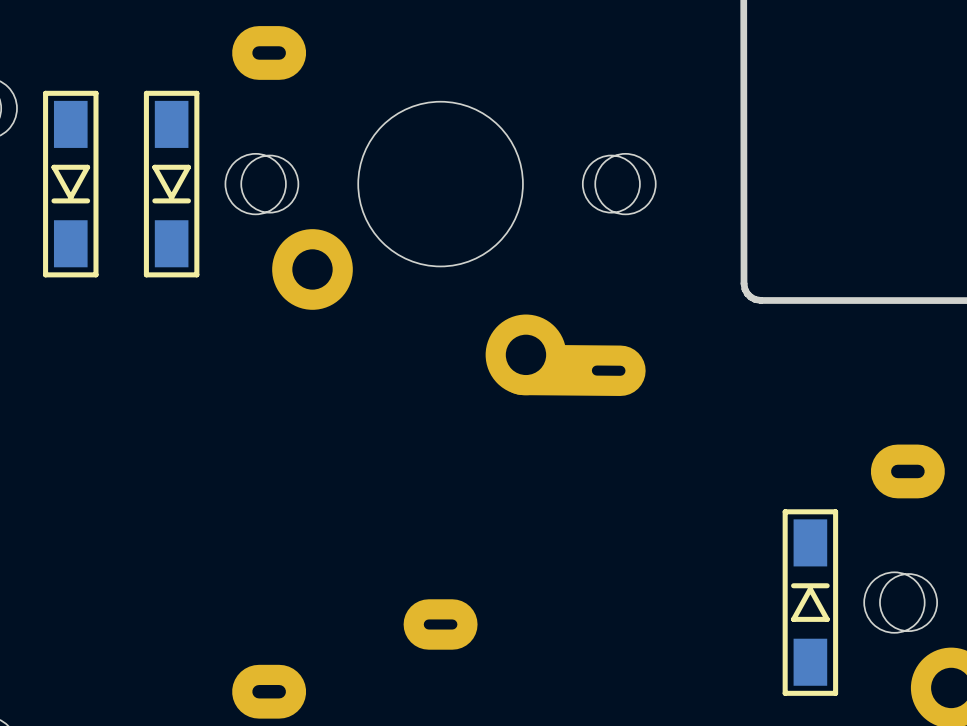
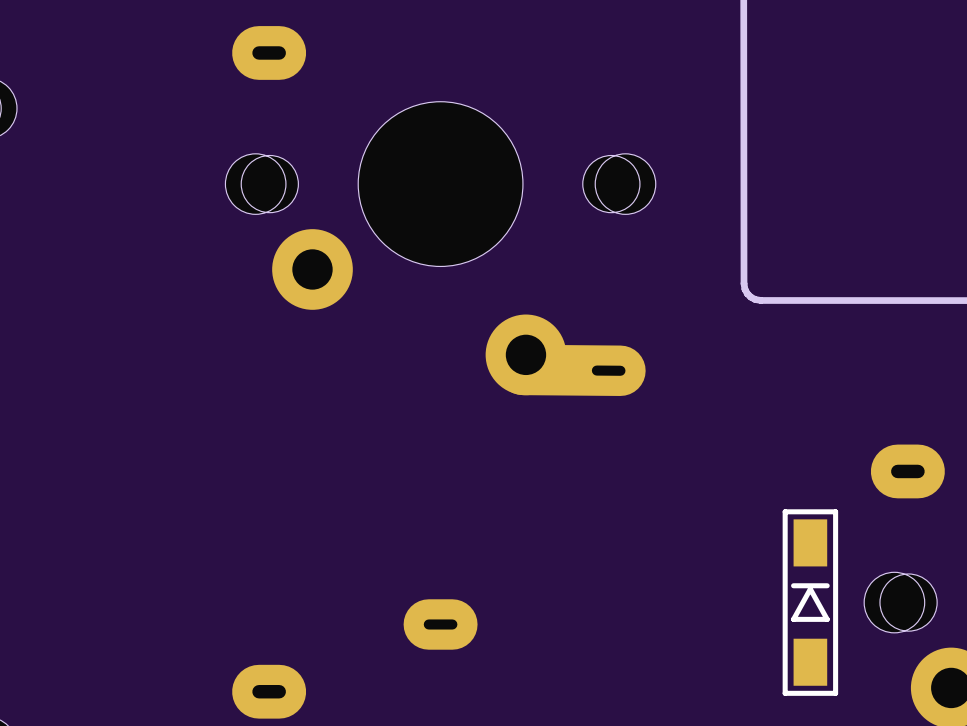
part: (70, 184) -> none
part: (171, 184) -> none

